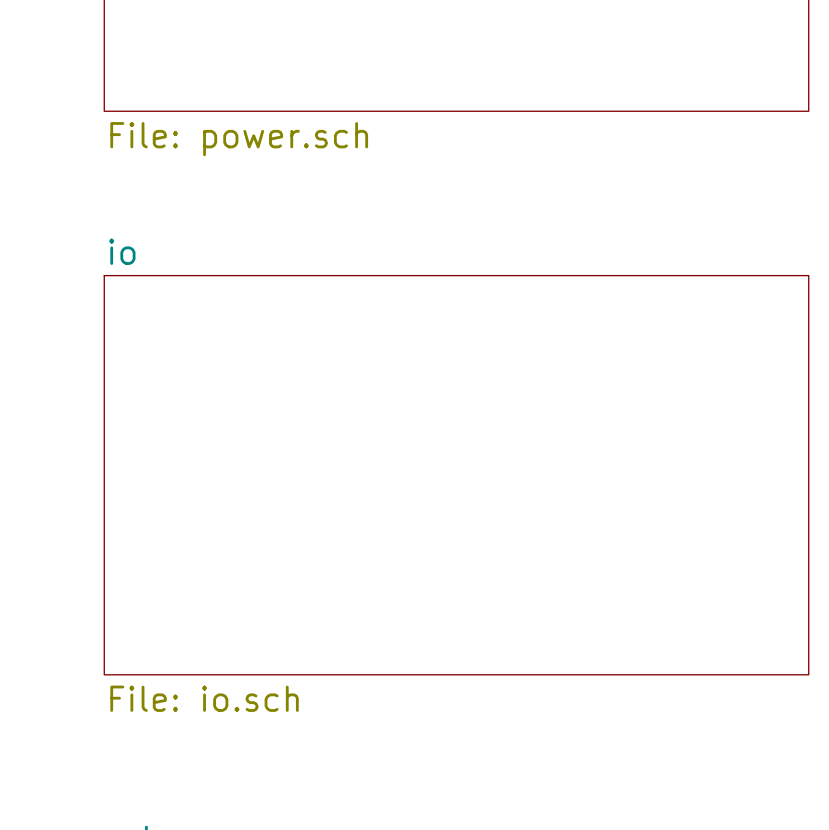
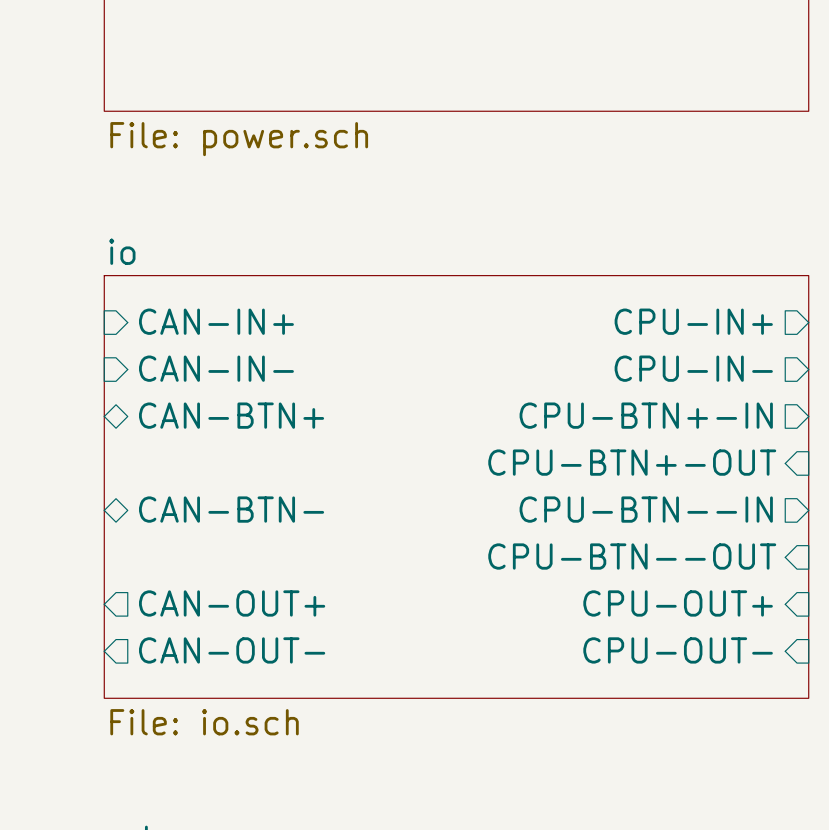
sheet io shape: [104, 275, 809, 675] -> [104, 275, 809, 699]
sheet pin: none -> CAN-IN+ (216, 321)
sheet pin: none -> CPU-IN+ (693, 321)
sheet pin: none -> CAN-IN- (216, 368)
sheet pin: none -> CPU-IN- (693, 368)
sheet pin: none -> CAN-BTN+ (231, 415)
sheet pin: none -> CPU-BTN+-IN (646, 415)
sheet pin: none -> CPU-BTN+-OUT (632, 462)
sheet pin: none -> CAN-BTN- (231, 509)
sheet pin: none -> CPU-BTN--IN (646, 509)
sheet pin: none -> CPU-BTN--OUT (632, 556)
sheet pin: none -> CAN-OUT+ (232, 603)
sheet pin: none -> CPU-OUT+ (678, 603)
sheet pin: none -> CAN-OUT- (232, 650)
sheet pin: none -> CPU-OUT- (678, 650)

